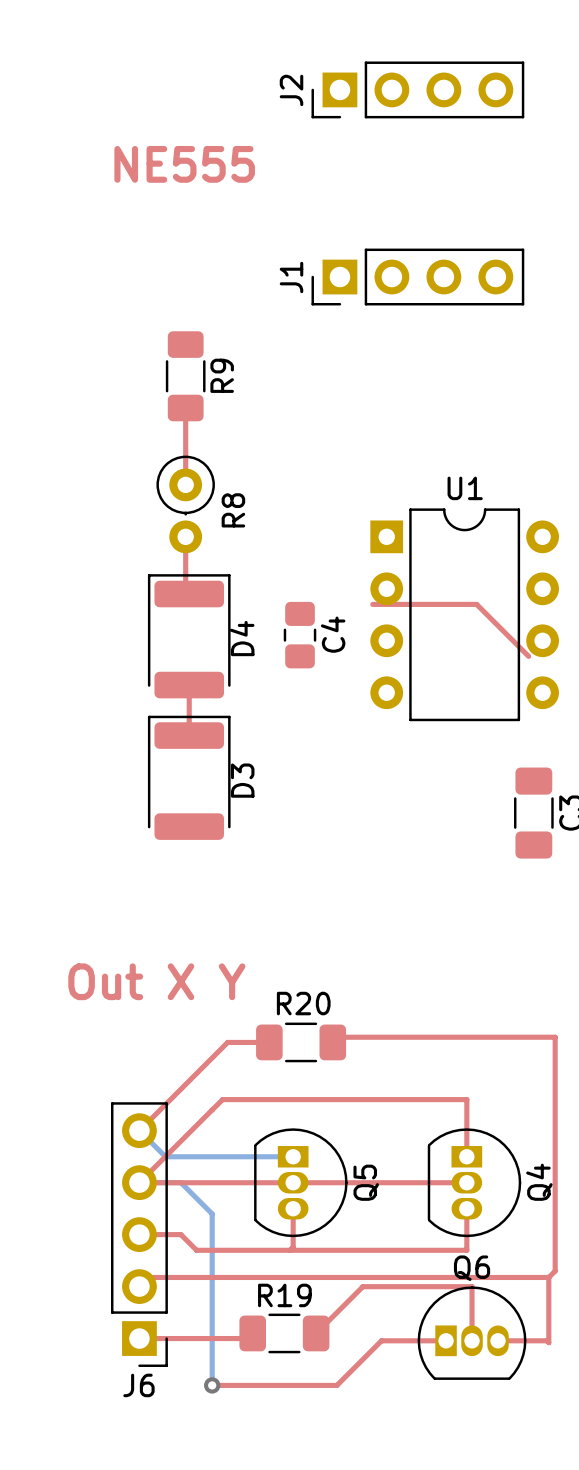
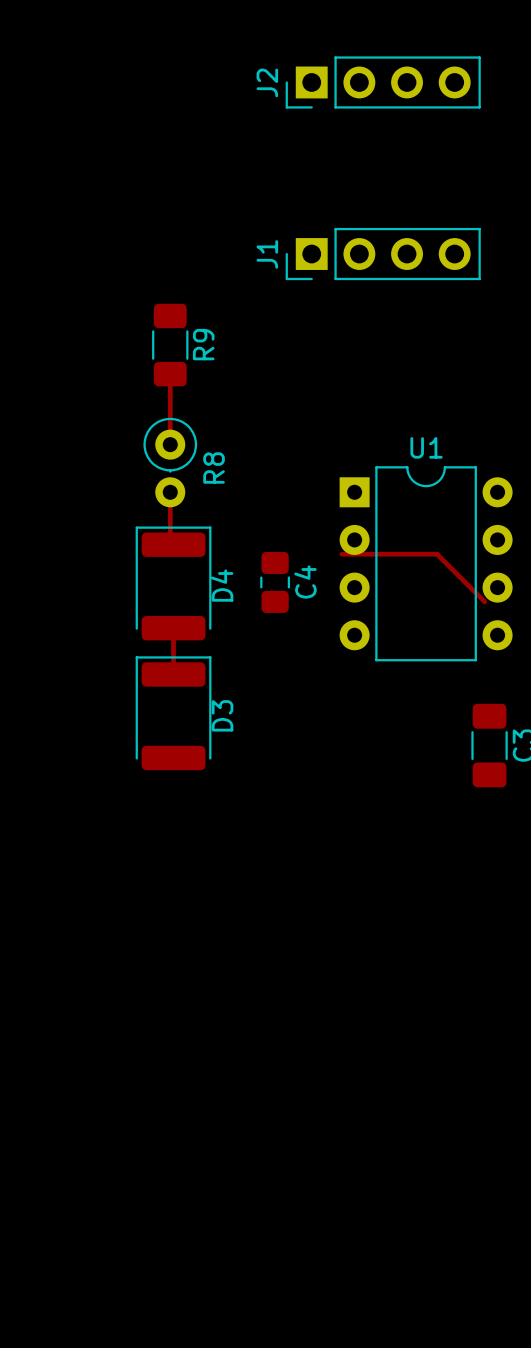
text: NE555 (184, 164) -> none
text: Out X Y (156, 981) -> none
top track: (269, 1042) (227, 1042) (139, 1130) -> none
R20: (301, 1042) -> none
top track: (332, 1042) (337, 1037) (555, 1037) (555, 1271) (548, 1277) -> none
bottom track: (139, 1130) (165, 1156) (293, 1156) -> none
top track: (466, 1156) (466, 1099) (222, 1099) (139, 1182) -> none
top track: (139, 1182) (466, 1182) -> none
bottom track: (139, 1182) (180, 1182) (212, 1213) (212, 1385) -> none
Q5: (300, 1182) -> none
Q4: (474, 1182) -> none
top track: (293, 1208) (293, 1247) (290, 1250) -> none
top track: (466, 1208) (466, 1250) (196, 1250) (180, 1234) (139, 1234) -> none
J6: (139, 1234) -> none
top track: (548, 1277) (148, 1277) (139, 1286) -> none
top track: (548, 1277) (548, 1342) (546, 1340) (498, 1340) -> none
top track: (252, 1333) (247, 1338) (139, 1338) -> none
R19: (284, 1333) -> none
top track: (316, 1333) (362, 1286) (472, 1286) (472, 1340) -> none
Q6: (472, 1333) -> none
top track: (446, 1340) (381, 1340) (336, 1385) (212, 1385) -> none
via: (212, 1385) -> none

